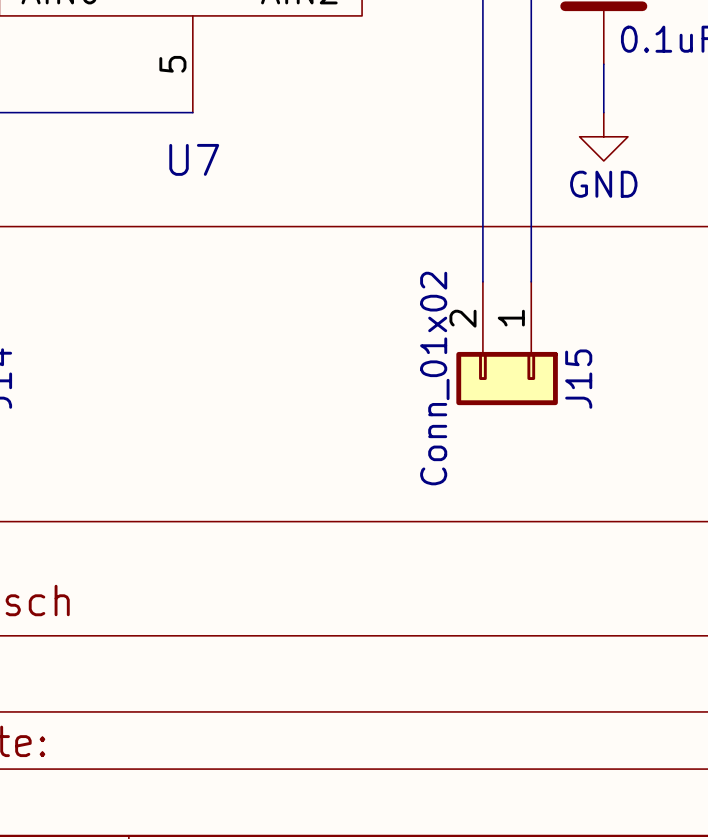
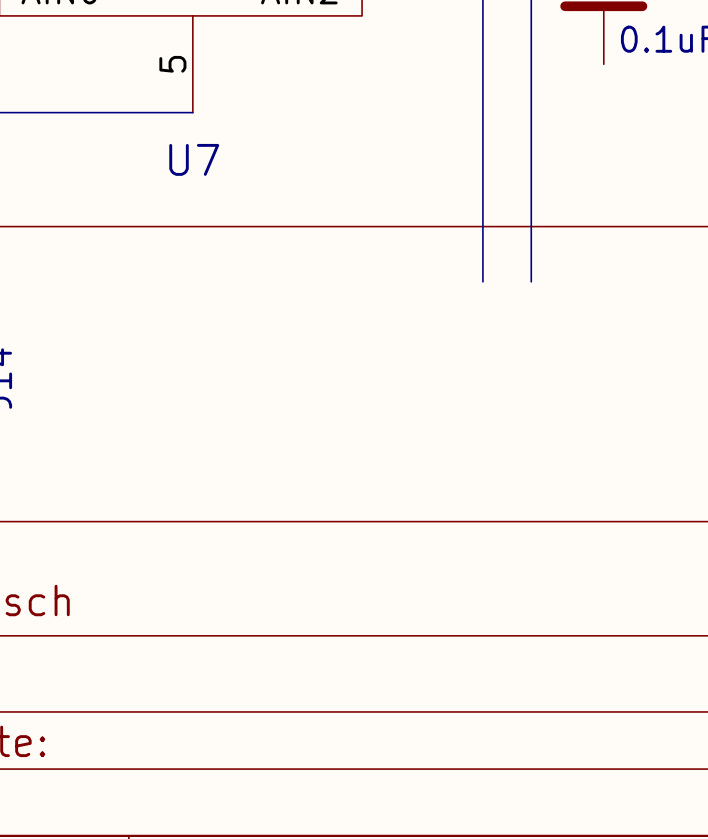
wire: (603, 64) (603, 112) -> none
power symbol: GND (603, 136) -> none
J15: Conn_01x02 (507, 343) -> none

